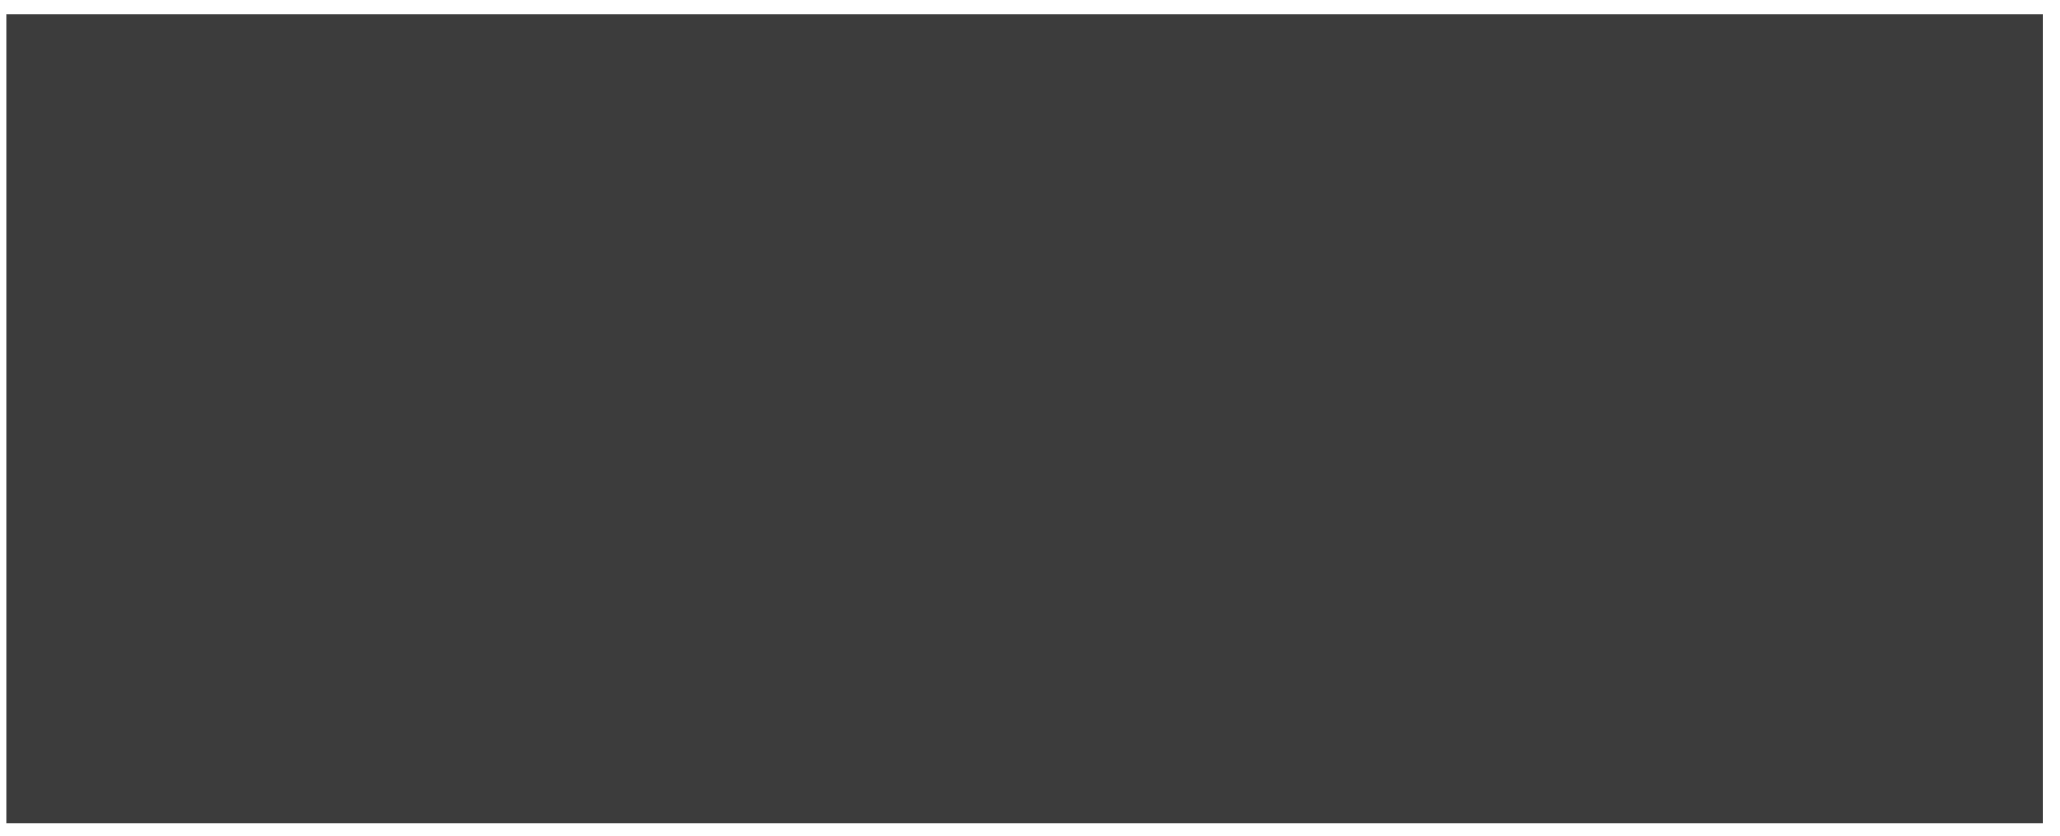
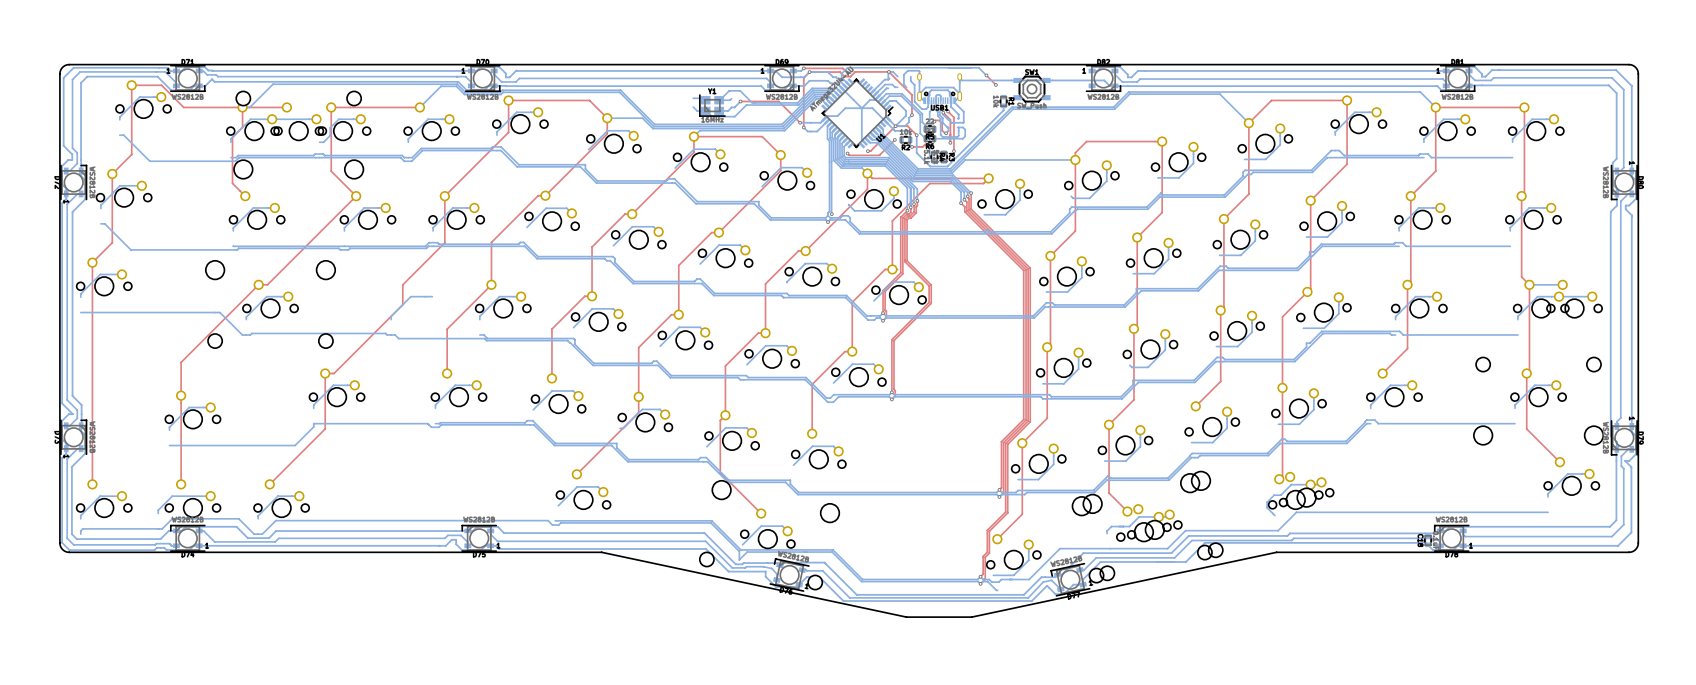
drawing: [6, 14, 2043, 824] -> none
board edge: none -> (1629, 64) (66, 64) (61, 68) (59, 73) (60, 545) (63, 550) (69, 552) (601, 552) (906, 617) (971, 617) (1276, 552) (1631, 552) (1636, 548) (1638, 543) (1638, 73) (1635, 67) (1629, 64)
bottom track: none -> (803, 68) (801, 70) (793, 70)
top track: none -> (803, 68) (842, 68) (847, 72)
via: none -> (803, 68)
bottom track: none -> (494, 70) (494, 74) (501, 81) (515, 81) (519, 78) (766, 78) (770, 82) (770, 85)
bottom track: none -> (1092, 70) (1097, 70) (1101, 66) (1119, 66) (1127, 74) (1127, 77) (1131, 77) (1137, 70) (1451, 70) (1455, 66) (1474, 66) (1481, 73) (1481, 76) (1485, 76) (1492, 70) (1616, 70) (1631, 85) (1631, 176) (1636, 180) (1636, 198) (1629, 205) (1625, 205) (1625, 209) (1631, 215) (1631, 431) (1635, 435) (1635, 454) (1629, 460) (1625, 460) (1631, 467) (1631, 532) (1618, 545) (1457, 545) (1453, 549) (1432, 549) (1425, 542) (1204, 542) (1185, 562) (1100, 562) (1083, 579) (1083, 584) (1073, 584) (1064, 594) (1055, 594) (1047, 585) (1031, 601) (843, 601) (819, 577) (806, 577) (796, 586) (775, 586) (765, 576) (765, 571) (728, 571) (706, 548) (499, 548) (495, 545) (485, 545) (481, 549) (461, 549) (456, 544) (456, 539) (451, 539) (445, 545) (193, 545) (189, 549) (166, 549) (164, 547) (156, 547) (154, 550) (69, 550) (62, 542) (62, 458) (66, 453) (66, 443) (62, 439) (62, 420) (68, 414) (72, 414) (62, 403) (62, 203) (66, 199) (66, 188) (62, 184) (62, 166) (68, 160) (72, 160) (72, 154) (63, 145) (63, 77) (73, 67) (167, 67) (170, 71) (181, 71) (185, 67) (204, 67) (212, 70) (476, 70) (480, 66) (499, 66) (505, 73) (505, 77) (509, 77) (516, 70) (775, 70) (782, 77) (804, 77) (809, 72) (828, 72) (845, 86)
bottom track: none -> (1114, 70) (1114, 74) (1122, 81) (1137, 81) (1140, 79) (1442, 79) (1446, 82) (1446, 85)
bottom track: none -> (1469, 70) (1469, 74) (1475, 80) (1491, 80) (1493, 77) (1611, 77) (1623, 89) (1623, 167) (1620, 171) (1616, 171)
bottom track: none -> (199, 71) (217, 76) (465, 76) (471, 82) (471, 85)
via: none -> (888, 71)
via: none -> (809, 72)
bottom track: none -> (986, 75) (978, 67) (847, 67) (841, 73) (841, 77) (848, 84)
top track: none -> (986, 75) (995, 84)
via: none -> (986, 75)
bottom track: none -> (897, 76) (893, 71) (888, 71) (888, 79)
bottom track: none -> (910, 76) (910, 81) (914, 85) (914, 101) (922, 109) (928, 107) (928, 96) (931, 90) (947, 90) (951, 96) (951, 106) (958, 114) (957, 118)
bottom track: none -> (959, 76) (959, 96) (954, 102) (963, 111) (963, 122) (951, 122) (943, 112)
bottom track: none -> (889, 78) (888, 79)
bottom track: none -> (959, 78) (961, 80) (1104, 80) (1109, 85) (1115, 86) (1437, 86) (1441, 90) (1459, 90) (1463, 85) (1469, 85) (1608, 85) (1616, 93) (1616, 158) (1612, 162) (1612, 184) (1616, 188) (1617, 205) (1610, 211) (1610, 435) (1616, 441) (1616, 520) (1609, 526) (1449, 526) (1445, 530) (1440, 530) (1437, 533) (1289, 533) (1287, 535) (1188, 535) (1171, 553) (1083, 553) (1061, 574) (1055, 577) (1041, 577) (1023, 594) (856, 594) (824, 562) (782, 562) (780, 565) (777, 563) (735, 564) (704, 533) (504, 533) (497, 526) (477, 526) (473, 530) (467, 531) (276, 531) (269, 538) (247, 538) (236, 526) (185, 526) (181, 530) (168, 530) (160, 539) (76, 539) (71, 534) (71, 466) (85, 453) (85, 435) (81, 431) (81, 404) (72, 395) (72, 212) (85, 199) (85, 180) (81, 176) (81, 82) (87, 76) (157, 76) (171, 90) (189, 90) (193, 86) (205, 86) (212, 79) (214, 81) (458, 81) (466, 90) (484, 90) (488, 85) (761, 86) (765, 90) (783, 90) (788, 85) (804, 85) (809, 80) (828, 80) (830, 83) (837, 83) (861, 108)
bottom track: none -> (888, 79) (884, 79) (872, 91)
via: none -> (995, 84)
bottom track: none -> (176, 86) (176, 82) (165, 71) (80, 71) (72, 79) (72, 148) (77, 152) (77, 163) (69, 171) (66, 171)
bottom track: none -> (897, 87) (892, 84) (885, 84) (877, 91)
bottom track: none -> (906, 87) (903, 84) (903, 74) (907, 70) (918, 70) (919, 96) (924, 100)
bottom track: none -> (888, 88) (875, 99) (870, 99) (861, 108)
bottom track: none -> (840, 91) (836, 88) (812, 88) (797, 102) (752, 102) (740, 90) (729, 90) (719, 100)
bottom track: none -> (959, 93) (953, 87) (925, 87) (919, 93)
bottom track: none -> (837, 94) (833, 90) (813, 90) (798, 105) (746, 105) (734, 116) (712, 116) (706, 110) (697, 110) (693, 107)
bottom track: none -> (161, 97) (139, 97) (119, 117) (119, 119)
bottom track: none -> (835, 97) (830, 92) (813, 92) (782, 124) (654, 124) (620, 90) (502, 90) (500, 92) (465, 92) (457, 84) (273, 84) (249, 107) (242, 107)
bottom track: none -> (693, 98) (703, 98) (705, 100)
bottom track: none -> (731, 98) (719, 100) (720, 101)
bottom track: none -> (832, 99) (827, 94) (814, 94) (782, 126) (653, 126) (619, 92) (503, 92) (501, 94) (464, 94) (456, 86) (441, 86) (419, 107)
bottom track: none -> (880, 99) (886, 93) (902, 93) (922, 114) (922, 122) (925, 125) (925, 129)
bottom track: none -> (931, 100) (929, 156) (934, 161)
bottom track: none -> (940, 100) (940, 96) (937, 95) (936, 110) (940, 118) (940, 134) (942, 136) (957, 136) (958, 127)
bottom track: none -> (740, 101) (728, 110) (719, 110) (720, 109)
top track: none -> (740, 101) (778, 101) (800, 122)
via: none -> (740, 101)
bottom track: none -> (829, 102) (824, 96) (815, 96) (783, 128) (652, 128) (642, 118) (607, 118)
bottom track: none -> (883, 102) (889, 96) (901, 96) (920, 114) (920, 133) (925, 138)
bottom track: none -> (827, 105) (820, 98) (816, 98) (784, 130) (699, 130) (693, 136)
bottom track: none -> (885, 105) (889, 100) (896, 100) (906, 110) (906, 115) (895, 126)
bottom track: none -> (1003, 105) (1003, 110) (947, 166) (930, 166) (916, 152) (916, 135)
top track: none -> (242, 107) (242, 127) (232, 137) (232, 183) (245, 196)
top track: none -> (286, 107) (183, 107) (161, 85) (131, 85) (131, 154) (112, 173) (112, 242) (92, 262)
top track: none -> (419, 107) (331, 107) (331, 171) (356, 196) (267, 284) (258, 284) (181, 362) (181, 484)
bottom track: none -> (1435, 107) (1420, 92) (1128, 92) (1113, 107) (1012, 107) (950, 168) (917, 168) (883, 134) (883, 129) (880, 126)
bottom track: none -> (861, 108) (861, 139) (864, 142)
bottom track: none -> (939, 111) (942, 122) (948, 127) (946, 133)
top track: none -> (948, 111) (953, 117) (953, 151)
via: none -> (948, 111)
bottom track: none -> (538, 112) (516, 112) (496, 132) (496, 135)
top track: none -> (943, 112) (950, 119) (950, 142)
via: none -> (943, 112)
bottom track: none -> (1376, 112) (1354, 112) (1335, 131) (1335, 135)
bottom track: none -> (911, 115) (905, 126) (895, 126)
top track: none -> (911, 115) (911, 94) (888, 71) (855, 71) (850, 76) (844, 76) (840, 72) (809, 72) (803, 77) (803, 127)
via: none -> (911, 115)
bottom track: none -> (316, 119) (250, 119) (230, 138) (230, 142)
bottom track: none -> (360, 119) (338, 119) (330, 127) (330, 135) (323, 142) (319, 142)
bottom track: none -> (449, 119) (428, 119) (408, 139) (408, 142)
bottom track: none -> (888, 118) (895, 126)
bottom track: none -> (1465, 119) (1443, 119) (1423, 139) (1423, 142)
bottom track: none -> (1553, 119) (1532, 119) (1512, 139) (1512, 142)
bottom track: none -> (827, 121) (817, 131) (807, 131) (803, 127)
top track: none -> (934, 121) (939, 120) (942, 123) (942, 130) (946, 133)
via: none -> (934, 121)
bottom track: none -> (800, 122) (820, 122) (827, 116) (837, 116) (845, 108) (872, 108) (895, 130) (909, 130) (911, 147)
via: none -> (800, 122)
bottom track: none -> (1248, 123) (1219, 94) (1129, 94) (1114, 109) (1013, 109) (951, 171) (917, 171) (877, 129)
bottom track: none -> (829, 124) (827, 126) (827, 138) (829, 140) (828, 215)
via: none -> (895, 126)
bottom track: none -> (832, 126) (830, 129) (831, 214)
via: none -> (803, 127)
bottom track: none -> (957, 127) (965, 129) (965, 136) (962, 138) (934, 138)
bottom track: none -> (1280, 128) (1280, 144) (1265, 159) (1244, 159)
bottom track: none -> (835, 129) (832, 132) (833, 160) (841, 168) (862, 168) (867, 173)
bottom track: none -> (837, 132) (834, 134) (835, 159) (842, 166) (885, 166) (907, 187) (907, 210)
bottom track: none -> (875, 132) (916, 173) (952, 173) (965, 159) (1075, 159)
via: none -> (946, 133)
bottom track: none -> (119, 135) (123, 135) (149, 161) (235, 161) (239, 157) (400, 157) (404, 161) (411, 161) (422, 150) (500, 150) (517, 166) (580, 166) (596, 183) (675, 183) (695, 203) (754, 203) (770, 219) (825, 219) (828, 222) (830, 219) (845, 219) (859, 233) (1051, 233) (1077, 209) (1147, 209) (1159, 197) (1225, 197) (1247, 174) (1253, 172) (1312, 172) (1327, 157) (1423, 157)
bottom track: none -> (840, 134) (837, 137) (837, 158) (843, 163) (886, 163) (910, 188) (910, 207)
bottom track: none -> (872, 134) (915, 175) (953, 175) (971, 193)
top track: none -> (916, 135) (907, 126) (895, 126) (870, 151) (867, 151)
via: none -> (916, 135)
bottom track: none -> (633, 135) (628, 130) (607, 130) (588, 149)
bottom track: none -> (842, 137) (839, 140) (839, 157) (844, 161) (887, 161) (913, 188) (914, 204)
bottom track: none -> (869, 137) (872, 139) (877, 139) (914, 177) (952, 177) (967, 192) (967, 196)
bottom track: none -> (845, 139) (842, 143) (842, 156) (844, 159) (888, 159) (917, 189) (917, 200)
bottom track: none -> (867, 139) (870, 142) (876, 142) (913, 179) (951, 179) (964, 192) (964, 199)
top track: none -> (894, 139) (879, 155) (849, 155) (847, 153)
via: none -> (894, 139)
bottom track: none -> (848, 142) (844, 146) (845, 157) (888, 157) (912, 181) (950, 181) (961, 191) (961, 203)
via: none -> (950, 142)
top track: none -> (933, 146) (925, 144) (922, 147) (911, 147)
via: none -> (911, 147)
bottom track: none -> (1193, 146) (1193, 163) (1178, 177) (1157, 177)
via: none -> (867, 151)
via: none -> (953, 151)
via: none -> (847, 153)
bottom track: none -> (720, 154) (715, 149) (693, 149) (675, 168)
bottom track: none -> (230, 157) (238, 155) (323, 154) (402, 155) (404, 157) (412, 157) (421, 148) (501, 146) (518, 164) (585, 164) (585, 168) (597, 180) (666, 180) (674, 178) (697, 201) (758, 201) (758, 205) (771, 217) (825, 217) (828, 215)
bottom track: none -> (1512, 157) (1431, 157) (1428, 154) (1344, 155) (1339, 150) (1331, 150) (1311, 170) (1245, 170) (1243, 176) (1224, 194) (1161, 194) (1161, 192) (1146, 207) (1071, 207) (1069, 212) (1050, 231) (988, 231) (987, 229) (985, 231) (860, 231) (850, 221) (848, 215) (830, 217) (828, 215)
bottom track: none -> (1106, 165) (1106, 181) (1089, 198) (1073, 198) (1071, 196)
bottom track: none -> (807, 172) (802, 167) (781, 167) (762, 186)
bottom track: none -> (1020, 183) (1020, 200) (1005, 214) (984, 214)
bottom track: none -> (141, 185) (119, 185) (100, 205) (100, 208)
bottom track: none -> (893, 191) (893, 198) (881, 210) (854, 210) (848, 204)
top track: none -> (971, 193) (971, 209) (1030, 268) (1030, 421) (1007, 444) (1007, 512) (989, 531) (989, 553) (985, 557) (985, 579) (980, 583)
via: none -> (971, 193)
bottom track: none -> (81, 193) (77, 193) (67, 204) (67, 400) (77, 410) (77, 418) (69, 425) (66, 425)
bottom track: none -> (1631, 193) (1628, 193) (1620, 201) (1620, 417) (1616, 421) (1616, 426)
top track: none -> (967, 196) (969, 209) (1028, 269) (1028, 421) (1005, 443) (1005, 512) (987, 530) (987, 552) (983, 556) (983, 574) (980, 576)
via: none -> (967, 196)
top track: none -> (964, 199) (966, 202) (966, 210) (1026, 269) (1026, 420) (1003, 442) (1003, 492) (999, 496)
via: none -> (964, 199)
top track: none -> (917, 200) (916, 212) (907, 220) (907, 260) (931, 285) (931, 303) (893, 340) (895, 396) (891, 399)
via: none -> (917, 200)
top track: none -> (961, 203) (964, 206) (964, 211) (1023, 270) (1023, 419) (1001, 441) (1001, 487) (999, 489)
via: none -> (961, 203)
top track: none -> (914, 204) (914, 211) (904, 219) (904, 261) (929, 285) (929, 302) (891, 339) (891, 392)
via: none -> (914, 204)
bottom track: none -> (1342, 206) (1342, 222) (1327, 237) (1306, 237)
top track: none -> (910, 207) (910, 212) (902, 218) (902, 273) (885, 291) (886, 317) (883, 320)
via: none -> (910, 207)
bottom track: none -> (274, 207) (253, 207) (233, 228) (233, 230)
bottom track: none -> (385, 207) (364, 207) (344, 227) (344, 230)
bottom track: none -> (474, 207) (452, 207) (433, 227) (433, 230)
bottom track: none -> (1440, 207) (1418, 207) (1399, 227) (1399, 230)
bottom track: none -> (1551, 207) (1529, 207) (1510, 227) (1510, 230)
top track: none -> (907, 210) (900, 217)
via: none -> (907, 210)
bottom track: none -> (571, 213) (566, 208) (546, 208) (526, 227)
via: none -> (831, 214)
top track: none -> (900, 217) (900, 272) (883, 290) (883, 313)
via: none -> (828, 222)
bottom track: none -> (100, 223) (104, 223) (130, 249) (338, 248) (348, 249) (426, 248) (428, 246) (524, 246) (537, 258) (604, 258) (610, 260) (633, 283) (701, 283) (713, 295) (845, 297) (868, 320) (880, 318) (883, 320) (885, 318) (1034, 318) (1045, 307) (1125, 307) (1141, 290) (1198, 290) (1218, 270) (1298, 270) (1322, 246) (1399, 246)
bottom track: none -> (1255, 224) (1255, 240) (1240, 255) (1219, 255)
bottom track: none -> (658, 231) (653, 226) (632, 226) (613, 245)
bottom track: none -> (1168, 242) (1168, 259) (1154, 273) (1133, 273)
bottom track: none -> (1510, 246) (1406, 246) (1402, 242) (1321, 244) (1313, 252) (1309, 252) (1309, 255) (1297, 268) (1228, 268) (1220, 266) (1197, 288) (1136, 288) (1136, 292) (1124, 304) (1054, 304) (1046, 302) (1033, 315) (885, 315) (883, 313) (880, 315) (866, 315) (846, 295) (714, 293) (700, 279) (694, 281) (633, 281) (614, 262) (612, 256) (537, 256) (523, 242) (518, 244) (429, 242) (425, 246) (233, 246)
bottom track: none -> (745, 250) (740, 245) (719, 245) (700, 264)
bottom track: none -> (1081, 261) (1081, 277) (1067, 292) (1046, 292)
top track: none -> (92, 262) (92, 484)
bottom track: none -> (832, 268) (826, 263) (805, 263) (787, 282)
top track: none -> (892, 269) (892, 220) (929, 183) (983, 183) (988, 178) (872, 178) (867, 173) (867, 189) (805, 251) (798, 251) (765, 283) (765, 333) (758, 333) (725, 365) (725, 415) (720, 420) (720, 472) (761, 513)
top track: none -> (897, 269) (885, 269) (852, 302) (852, 351) (845, 351) (812, 384) (812, 433)
bottom track: none -> (122, 274) (100, 274) (80, 293) (80, 297)
bottom track: none -> (1562, 284) (1529, 284)
bottom track: none -> (918, 287) (913, 282) (892, 282) (873, 300)
bottom track: none -> (288, 296) (266, 296) (246, 317) (246, 319)
bottom track: none -> (432, 296) (410, 296) (391, 316) (391, 319)
bottom track: none -> (521, 296) (499, 296) (479, 316) (479, 319)
bottom track: none -> (1338, 297) (1338, 313) (1324, 328) (1303, 328)
bottom track: none -> (1437, 296) (1415, 296) (1395, 316) (1395, 319)
bottom track: none -> (1592, 296) (1537, 296) (1517, 316) (1517, 319)
bottom track: none -> (80, 312) (219, 312) (242, 334) (385, 333) (395, 334) (398, 338) (567, 340) (593, 365) (658, 365) (670, 377) (805, 379) (827, 402) (833, 402) (838, 396) (889, 396) (891, 399) (894, 396) (1121, 398) (1138, 382) (1194, 382) (1215, 361) (1294, 361) (1322, 333) (1395, 334)
via: none -> (883, 313)
bottom track: none -> (618, 314) (613, 308) (592, 308) (573, 327)
bottom track: none -> (1252, 315) (1252, 332) (1237, 346) (1216, 346)
via: none -> (883, 320)
bottom track: none -> (705, 332) (700, 327) (679, 327) (660, 346)
bottom track: none -> (1165, 334) (1165, 349) (1147, 367) (1131, 367) (1129, 365)
bottom track: none -> (1517, 334) (1403, 334) (1399, 331) (1321, 331) (1309, 343) (1306, 343) (1306, 347) (1294, 359) (1224, 359) (1216, 357) (1194, 380) (1133, 380) (1133, 384) (1121, 396) (894, 394) (891, 392) (889, 394) (833, 394) (830, 398) (826, 398) (806, 377) (671, 375) (656, 361) (651, 363) (593, 363) (574, 344) (573, 338) (487, 338) (483, 334) (479, 334)
bottom track: none -> (791, 350) (786, 345) (765, 345) (746, 364)
bottom track: none -> (1078, 352) (1078, 369) (1063, 383) (1042, 383)
bottom track: none -> (878, 369) (873, 364) (852, 364) (833, 383)
top track: none -> (447, 373) (447, 329) (491, 284) (491, 242) (538, 195) (545, 195) (607, 133) (607, 118) (589, 100) (508, 100) (508, 132) (444, 196) (444, 242) (402, 284) (402, 304) (334, 373) (325, 373) (325, 428) (269, 484)
top track: none -> (1382, 373) (1407, 348) (1407, 284) (1410, 281) (1410, 196) (1435, 171) (1435, 107) (1524, 107) (1521, 277) (1529, 284) (1529, 370) (1526, 373) (1526, 428) (1559, 462)
top track: none -> (551, 378) (551, 329) (584, 296) (592, 296) (592, 247) (624, 214) (632, 214) (693, 152) (693, 136) (762, 136) (780, 155) (780, 170) (718, 232) (711, 232) (678, 265) (678, 314) (671, 314) (638, 347) (638, 412) (576, 474)
bottom track: none -> (354, 385) (333, 385) (313, 405) (313, 408)
bottom track: none -> (476, 385) (455, 385) (435, 405) (435, 408)
bottom track: none -> (1412, 385) (1390, 385) (1370, 405) (1370, 408)
bottom track: none -> (1556, 385) (1534, 385) (1514, 405) (1514, 408)
via: none -> (891, 392)
bottom track: none -> (1313, 393) (1313, 409) (1299, 424) (1278, 424)
bottom track: none -> (578, 396) (573, 391) (552, 391) (533, 409)
via: none -> (891, 399)
top track: none -> (1195, 406) (1220, 381) (1220, 310) (1223, 307) (1223, 219) (1248, 194) (1248, 123) (1271, 100) (1347, 100) (1347, 164) (1310, 200) (1310, 288) (1282, 316) (1282, 476) (1279, 479)
bottom track: none -> (210, 407) (189, 407) (169, 427) (169, 430)
bottom track: none -> (1227, 411) (1227, 428) (1212, 442) (1191, 442)
bottom track: none -> (665, 414) (660, 409) (642, 409) (623, 428) (619, 428)
bottom track: none -> (1370, 423) (1366, 423) (1347, 443) (1280, 443) (1268, 455) (1200, 455) (1198, 457) (1191, 457) (1168, 480) (1106, 480) (1094, 492) (1026, 492) (1024, 494) (1001, 494) (999, 496) (997, 494) (797, 494) (785, 482) (728, 482) (707, 461) (627, 461) (611, 445) (554, 445) (533, 424) (441, 424) (438, 427) (431, 427) (429, 424)
bottom track: none -> (1514, 423) (1378, 423) (1374, 420) (1366, 420) (1346, 441) (1287, 441) (1281, 439) (1267, 453) (1192, 453) (1167, 478) (1110, 478) (1107, 476) (1093, 490) (1018, 490) (1016, 492) (1002, 492) (999, 489) (996, 492) (798, 492) (790, 484) (790, 480) (728, 480) (706, 457) (698, 459) (628, 459) (616, 447) (616, 443) (555, 443) (532, 420) (525, 422) (435, 423)
bottom track: none -> (428, 424) (313, 423) (313, 426) (295, 445) (169, 445)
bottom track: none -> (1140, 430) (1140, 446) (1125, 461) (1104, 461)
bottom track: none -> (751, 433) (746, 427) (725, 427) (706, 446)
bottom track: none -> (81, 448) (77, 448) (67, 459) (67, 538) (73, 544) (169, 543) (176, 545)
bottom track: none -> (1053, 448) (1053, 464) (1038, 479) (1018, 479)
bottom track: none -> (1631, 449) (1628, 449) (1621, 456) (1621, 466) (1623, 468) (1623, 524) (1611, 536) (1465, 536) (1463, 530)
bottom track: none -> (838, 451) (833, 446) (812, 446) (793, 465)
bottom track: none -> (1589, 474) (1567, 474) (1548, 493) (1548, 496)
bottom track: none -> (1321, 482) (1319, 484) (1291, 484) (1280, 495) (1274, 495) (1267, 502) (1267, 507) (1274, 515)
via: none -> (999, 489)
bottom track: none -> (603, 492) (598, 486) (577, 486) (558, 505)
bottom track: none -> (121, 496) (100, 496) (80, 515) (80, 518)
bottom track: none -> (210, 496) (172, 496) (158, 510) (158, 513)
bottom track: none -> (299, 496) (277, 496) (258, 515) (258, 518)
via: none -> (999, 496)
top track: none -> (1127, 511) (1109, 493) (1109, 424) (1133, 399) (1133, 328) (1137, 325) (1137, 237) (1162, 212) (1162, 141) (1086, 141) (1075, 152) (1075, 231) (1050, 255) (1050, 344) (1047, 347) (1047, 418) (1022, 443) (1022, 514) (997, 539)
bottom track: none -> (1548, 512) (1296, 512) (1278, 530) (1185, 530) (1167, 548) (1060, 548) (1029, 579) (1001, 579) (998, 582) (991, 582) (980, 576) (977, 579) (862, 579) (833, 549) (740, 549) (711, 520) (555, 520)
bottom track: none -> (1169, 514) (1167, 516) (1139, 516) (1129, 526) (1111, 526) (1107, 533)
bottom track: none -> (199, 530) (203, 530) (214, 541) (275, 541) (278, 538) (444, 538) (447, 535) (460, 535) (467, 542) (467, 545)
bottom track: none -> (490, 530) (490, 534) (497, 541) (705, 541) (732, 567) (763, 566)
bottom track: none -> (787, 531) (782, 526) (761, 526) (742, 544)
bottom track: none -> (80, 534) (82, 528) (162, 528) (172, 518) (238, 518) (254, 534) (262, 534) (275, 520) (548, 520) (552, 525) (558, 525) (560, 522) (710, 522) (739, 551) (739, 559) (747, 552) (832, 552) (861, 581) (978, 581) (980, 583) (987, 581) (997, 590)
bottom track: none -> (1028, 544) (1028, 560) (1013, 575) (993, 575)
bottom track: none -> (1440, 545) (1440, 542) (1436, 538) (1191, 540) (1174, 557) (1096, 557) (1084, 570) (1080, 570)
bottom track: none -> (763, 566) (771, 568) (776, 574) (776, 579)
bottom track: none -> (802, 570) (822, 570) (849, 597) (1028, 597) (1043, 582) (1051, 580) (1060, 589)
via: none -> (980, 576)
via: none -> (980, 583)

